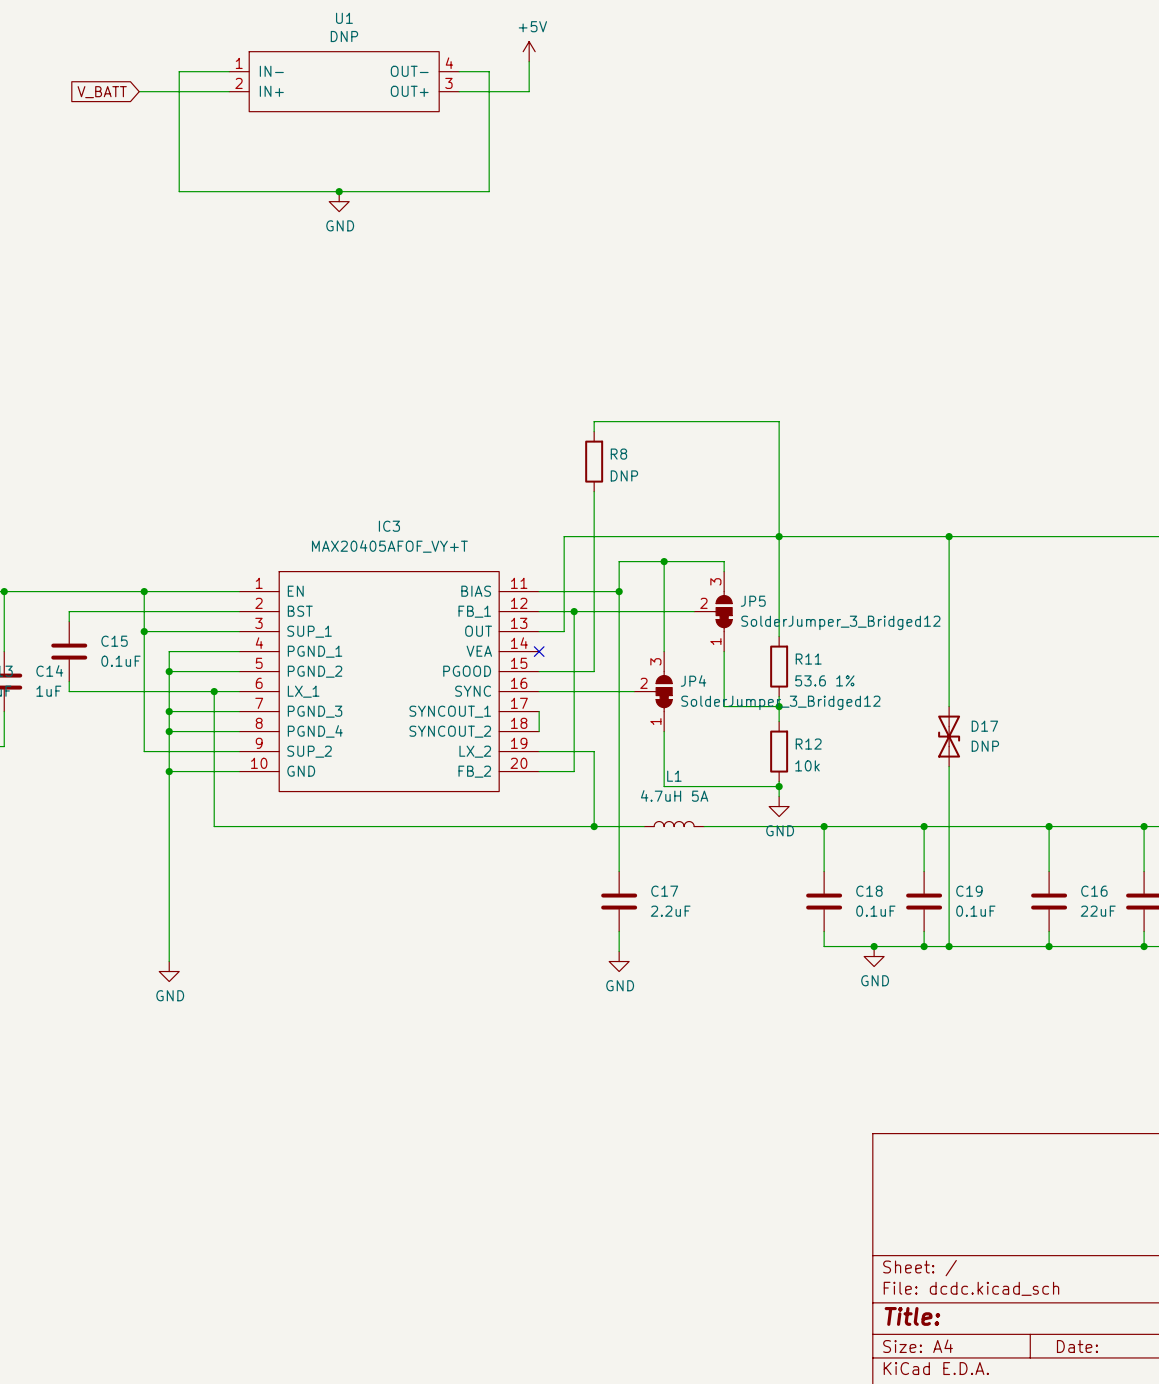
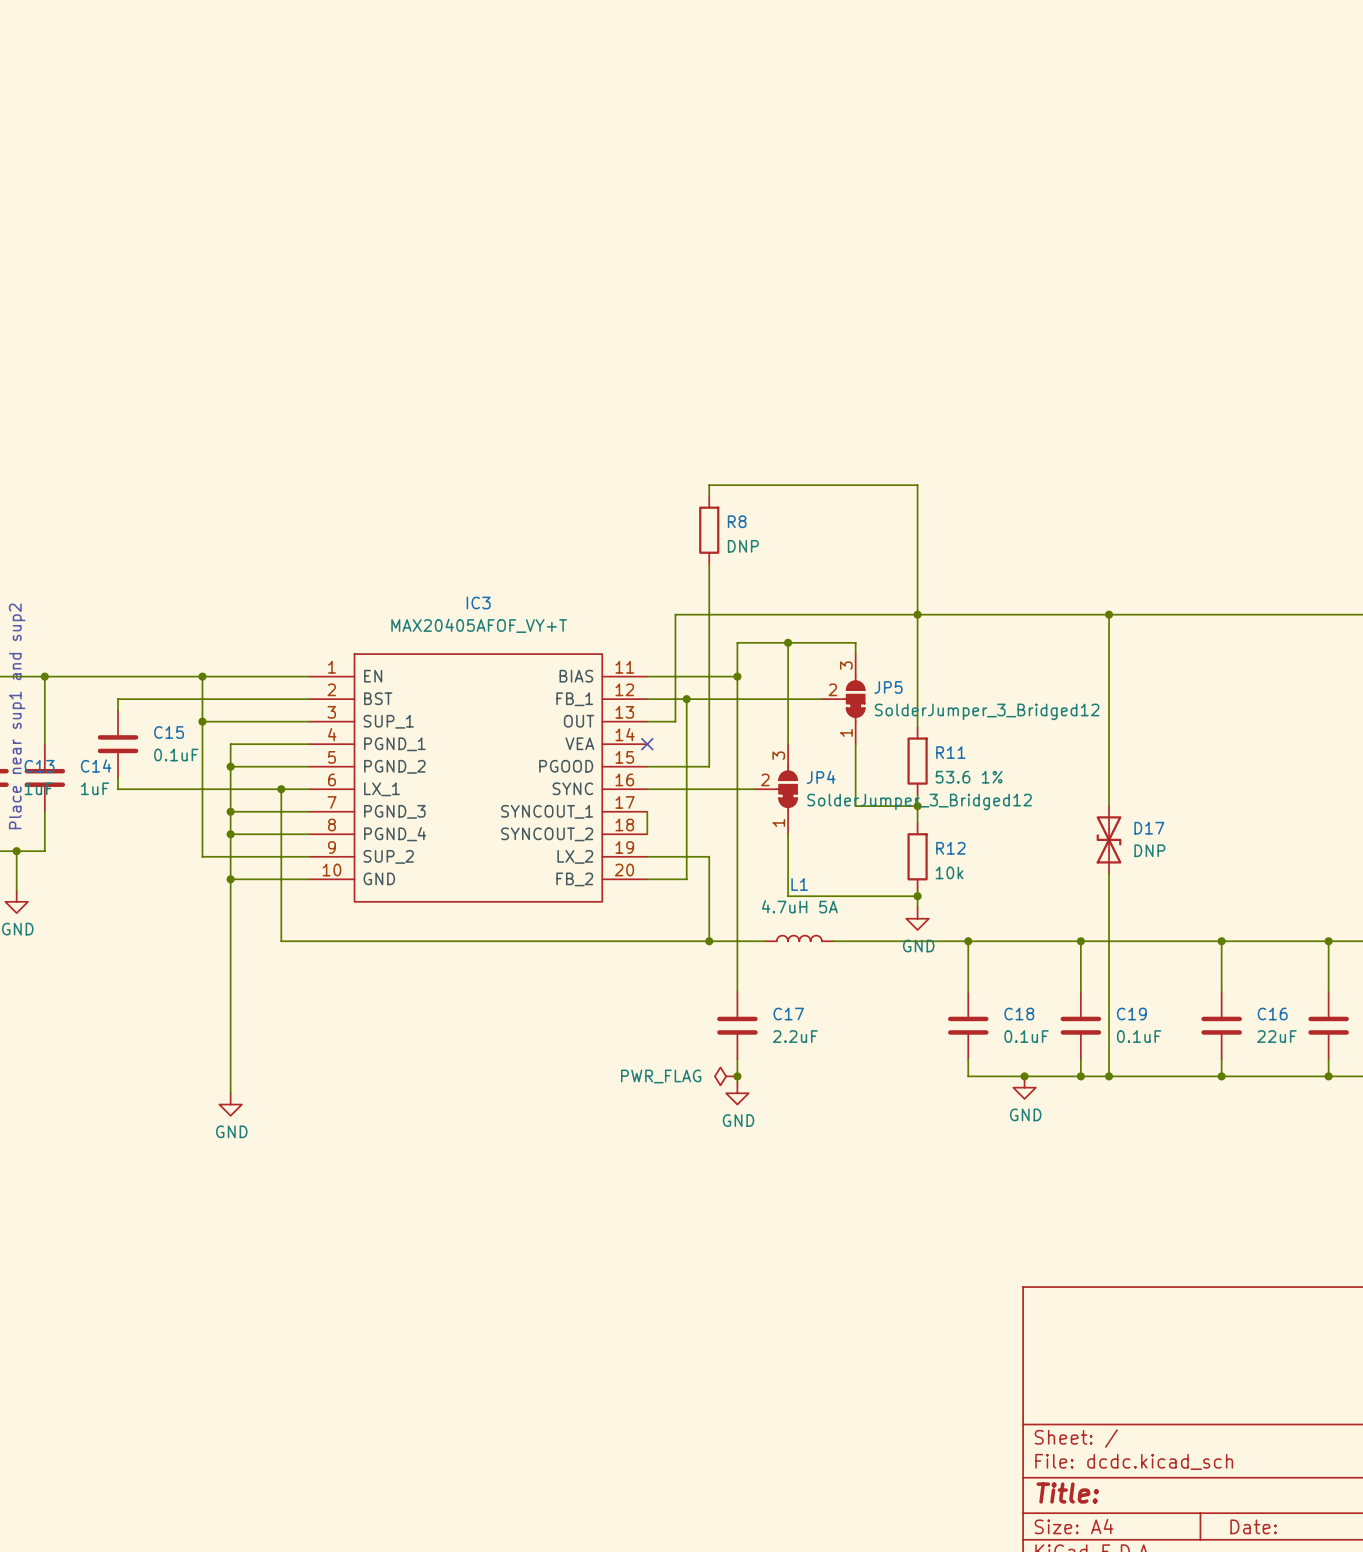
power symbol: +5V (529, 51) -> none
wire: (529, 61) (529, 91) (459, 91) -> none
wire: (229, 71) (179, 71) (179, 191) (489, 191) (489, 71) (459, 71) -> none
U1: DNP (344, 81) -> none
wire: (139, 91) (229, 91) -> none
global label: V_BATT (102, 92) -> none
junction: (339, 191) -> none
power symbol: GND (339, 201) -> none
power symbol: none -> PWR_FLAG (726, 1076)
junction: none -> (737, 1076)

